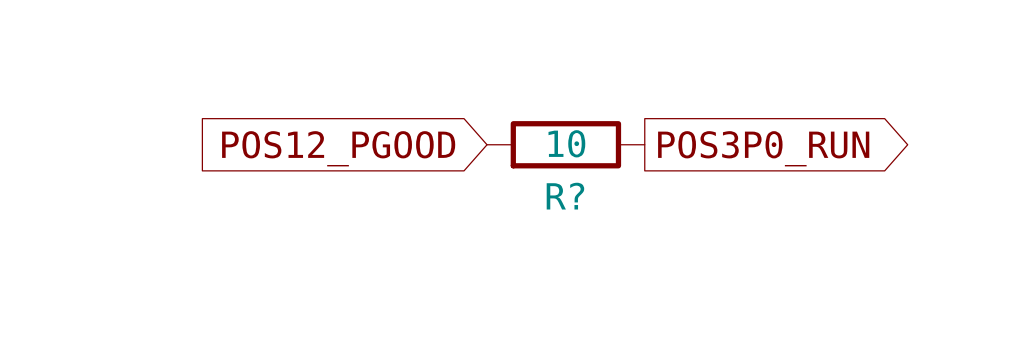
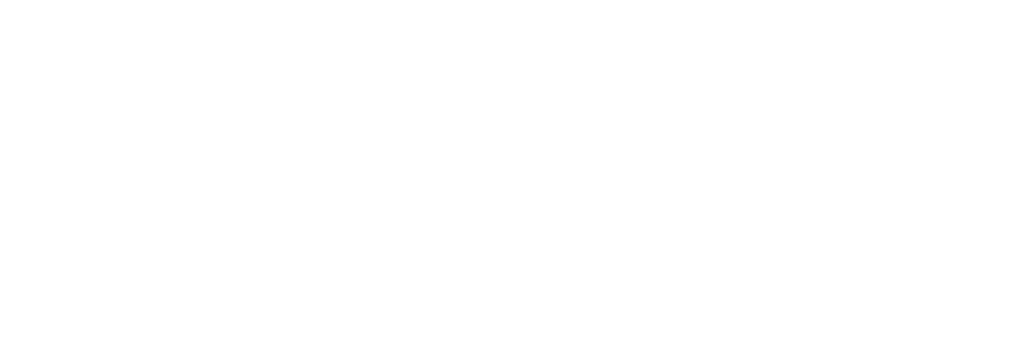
R?: 10 (565, 144) -> none
global label: POS12_PGOOD (338, 148) -> none
global label: POS3P0_RUN (763, 148) -> none

